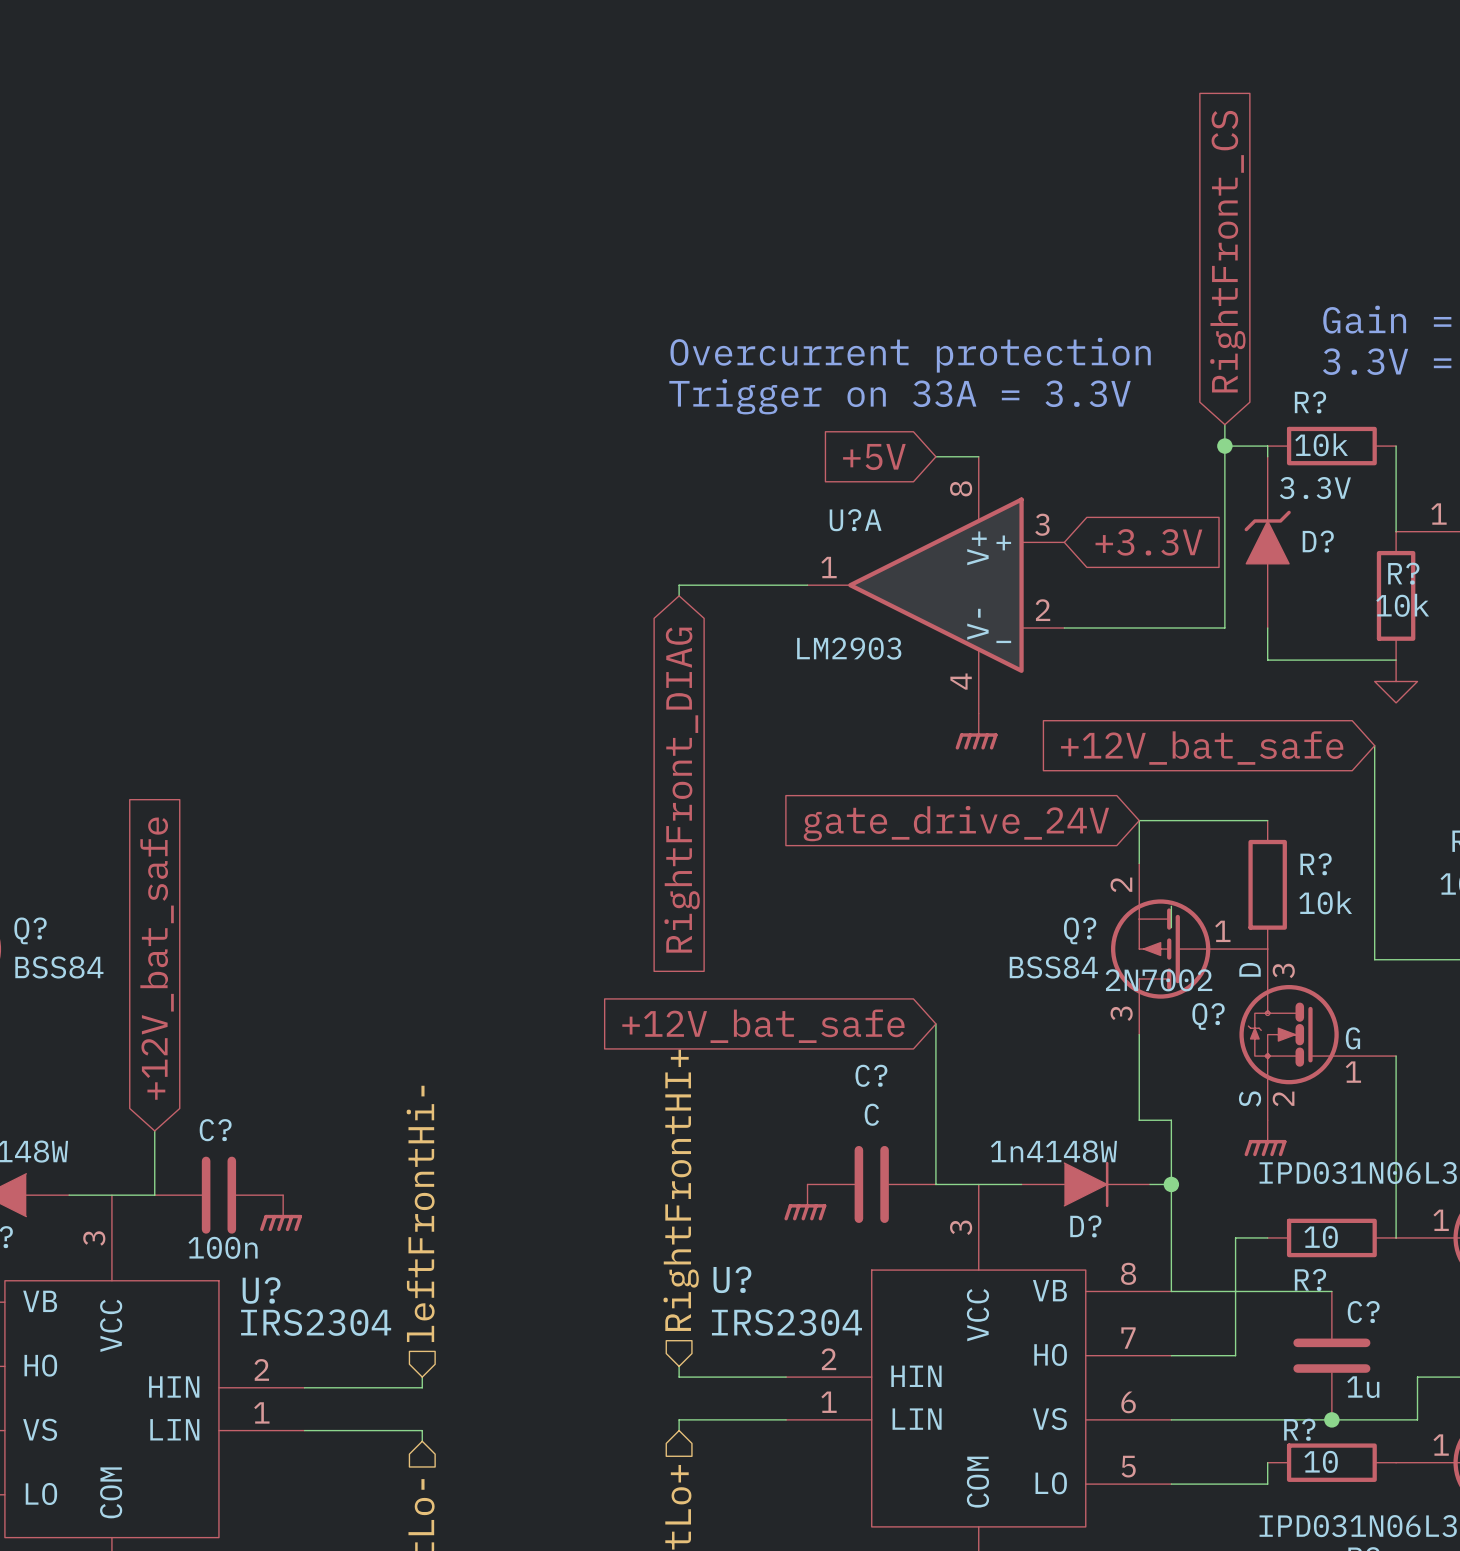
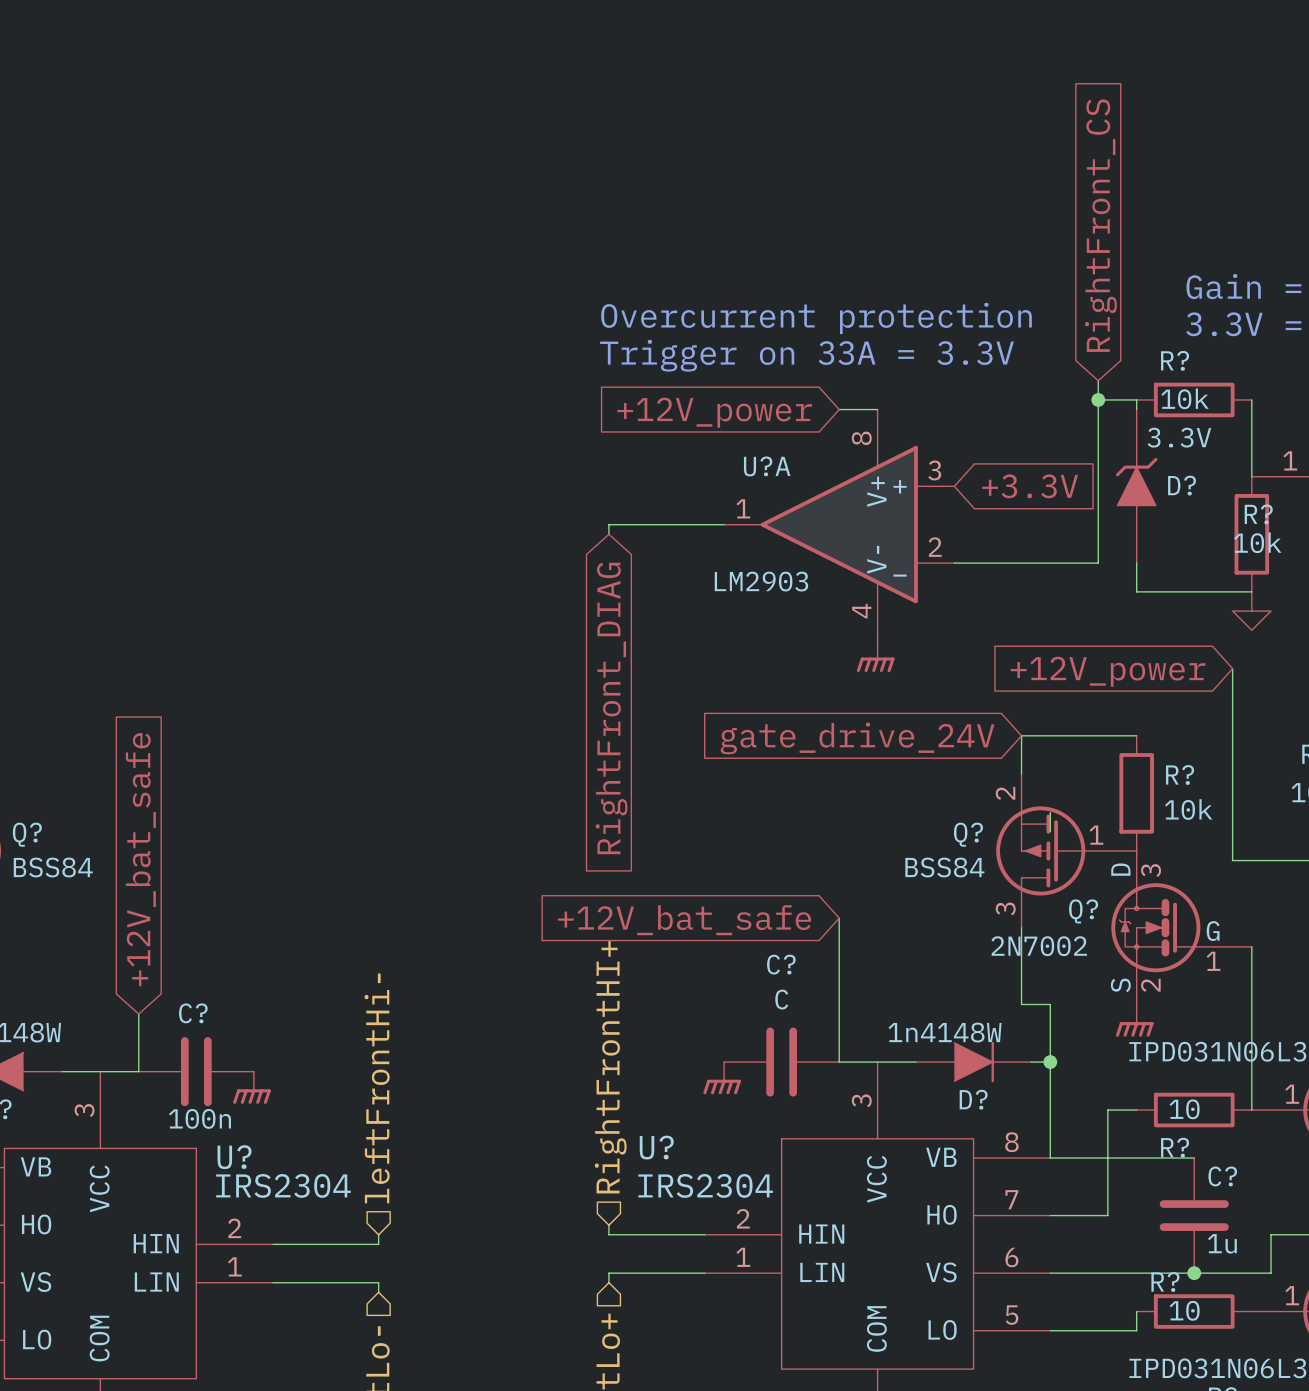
global label: +5V (874, 456) -> +12V_power (714, 412)
global label: +12V_bat_safe (1202, 748) -> +12V_power (1108, 671)
Q? value position: 2N7002 (1159, 980) -> 2N7002 (1039, 946)

